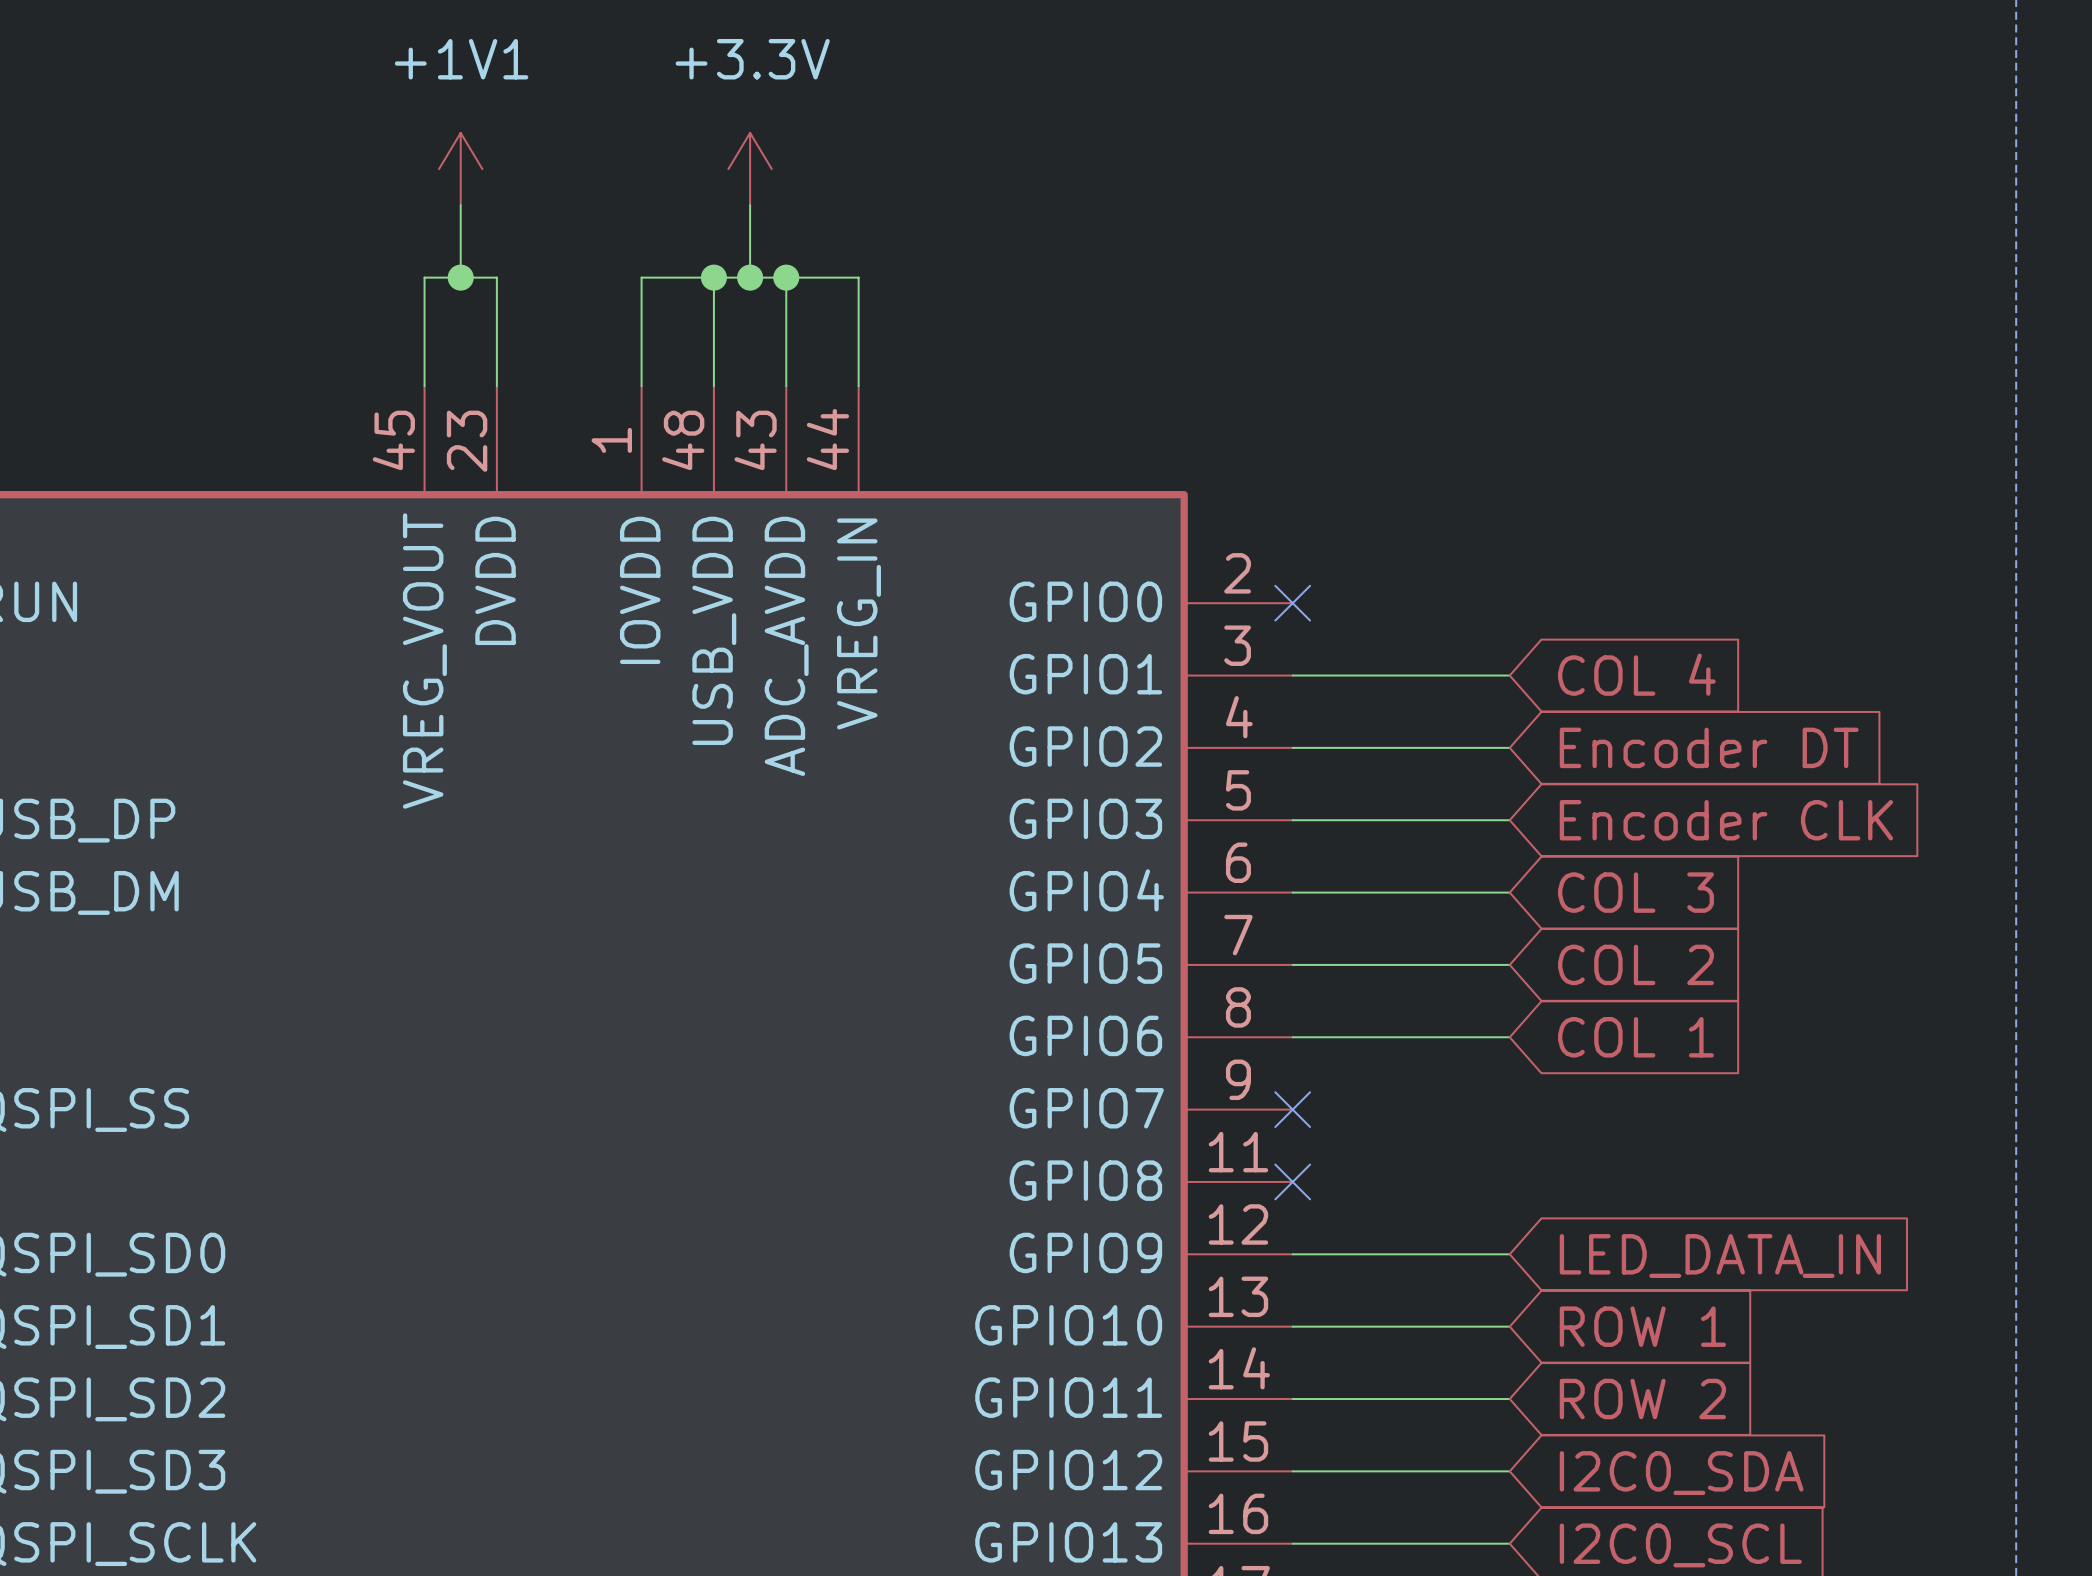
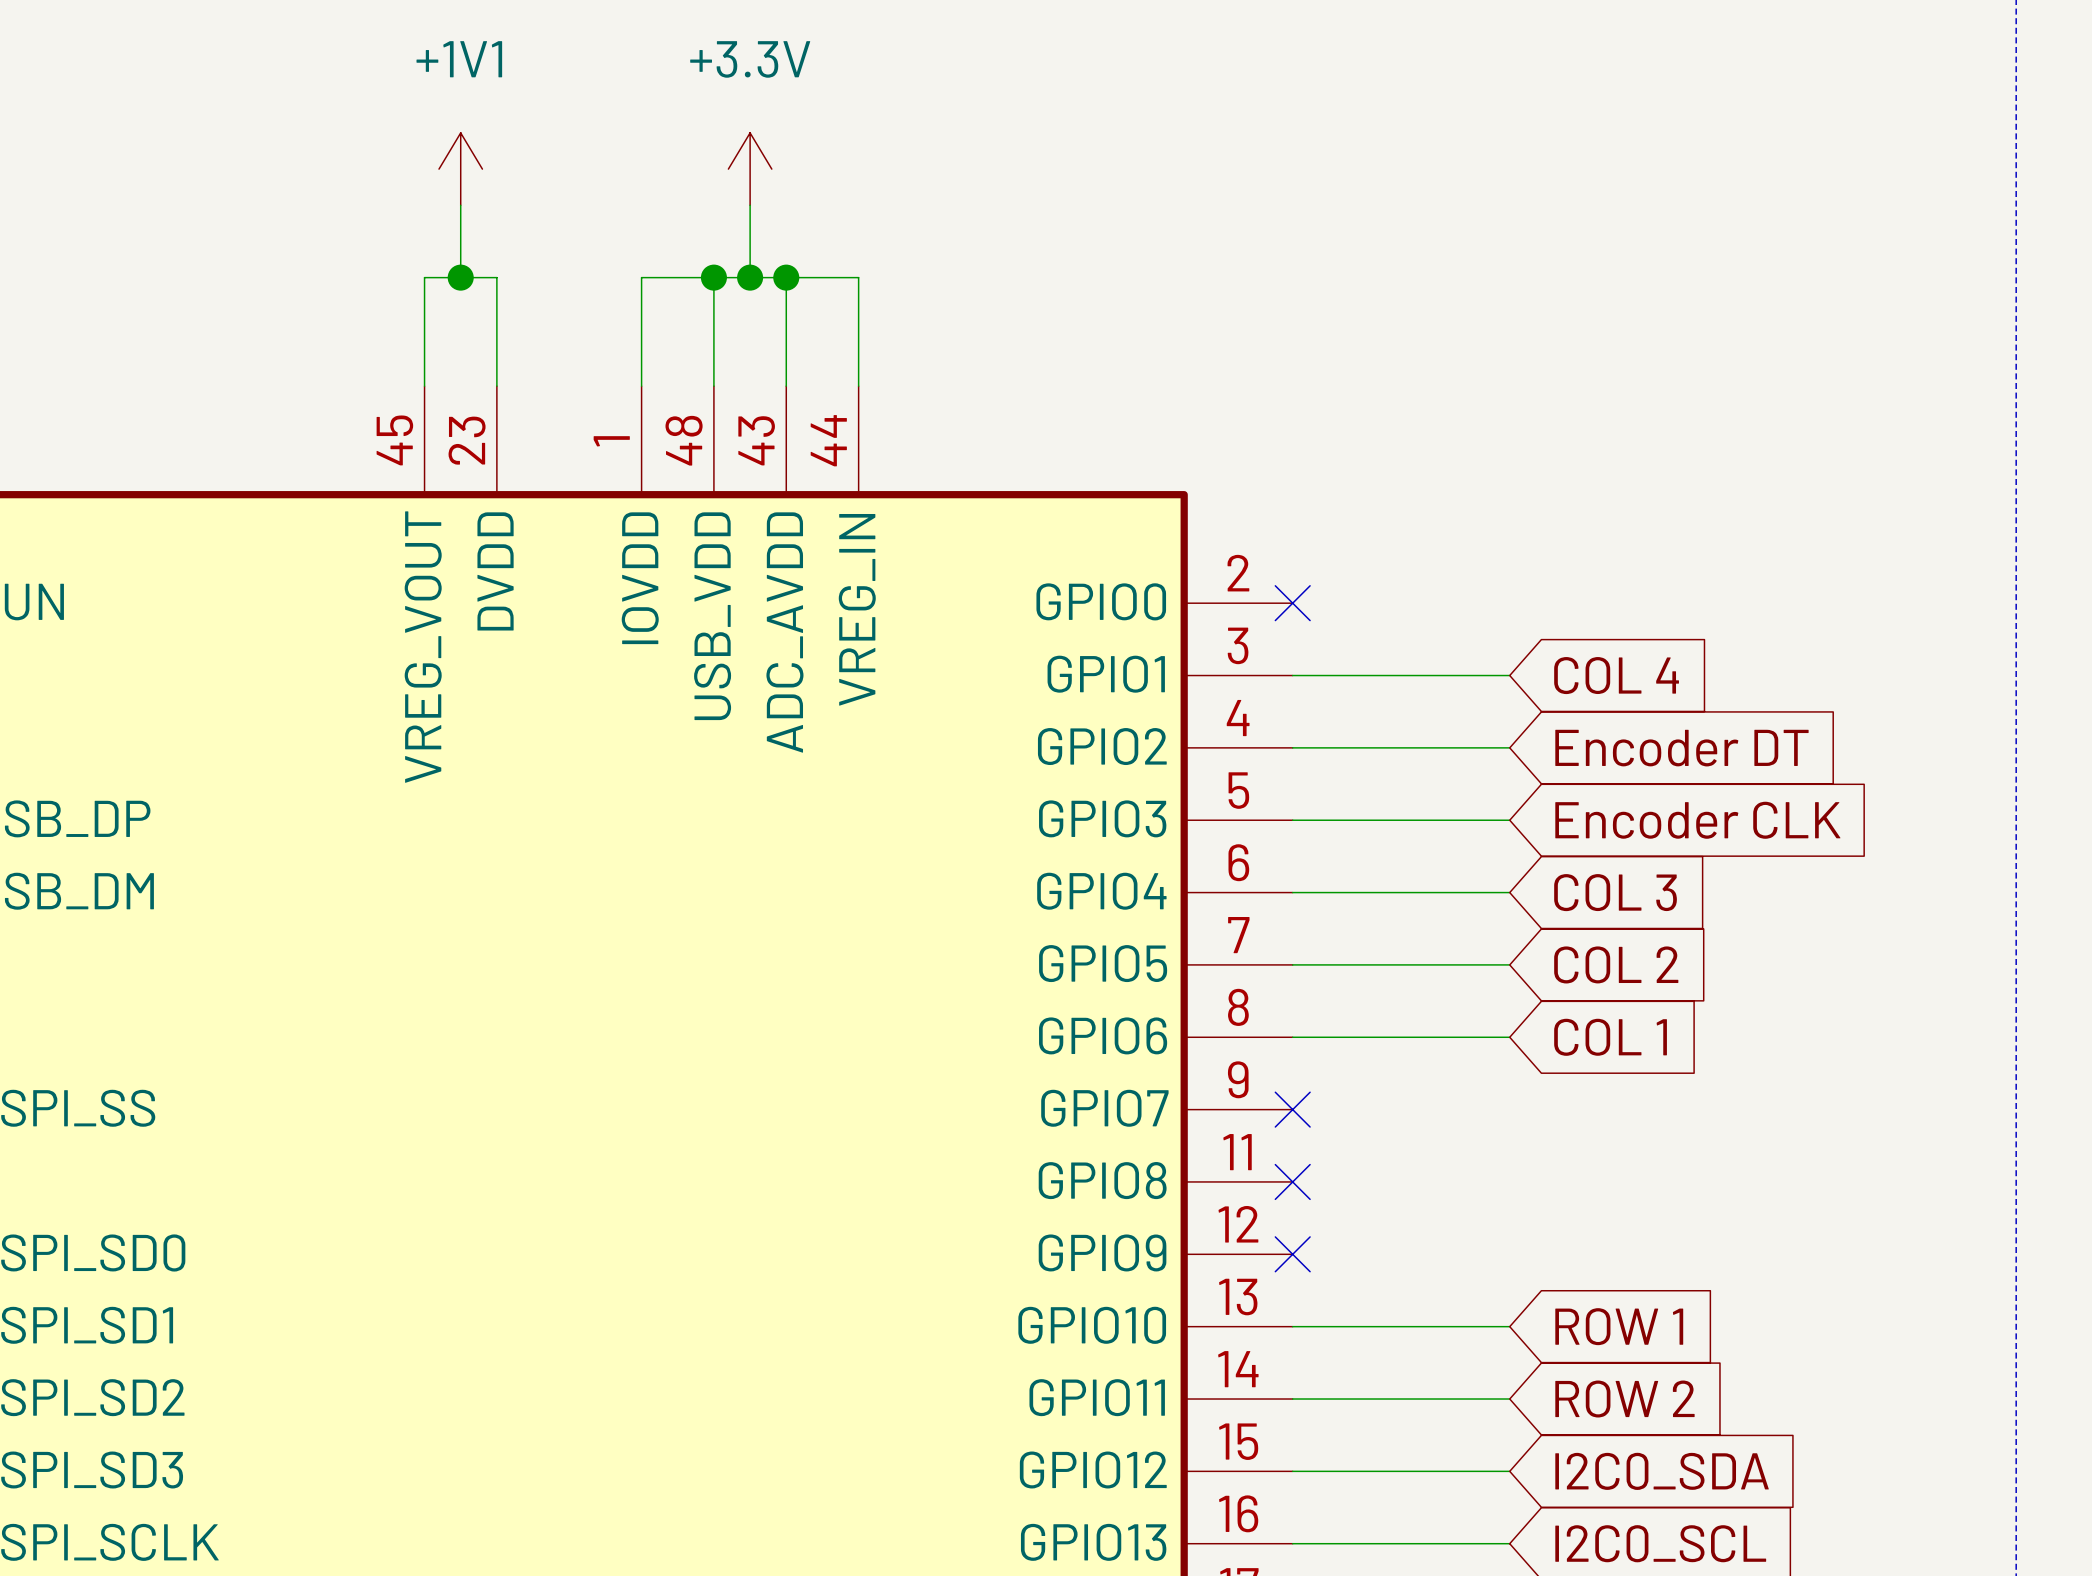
wire: (1292, 1254) (1509, 1254) -> none
no-connect mark: none -> (1292, 1254)
global label: LED_DATA_IN (1720, 1256) -> none

